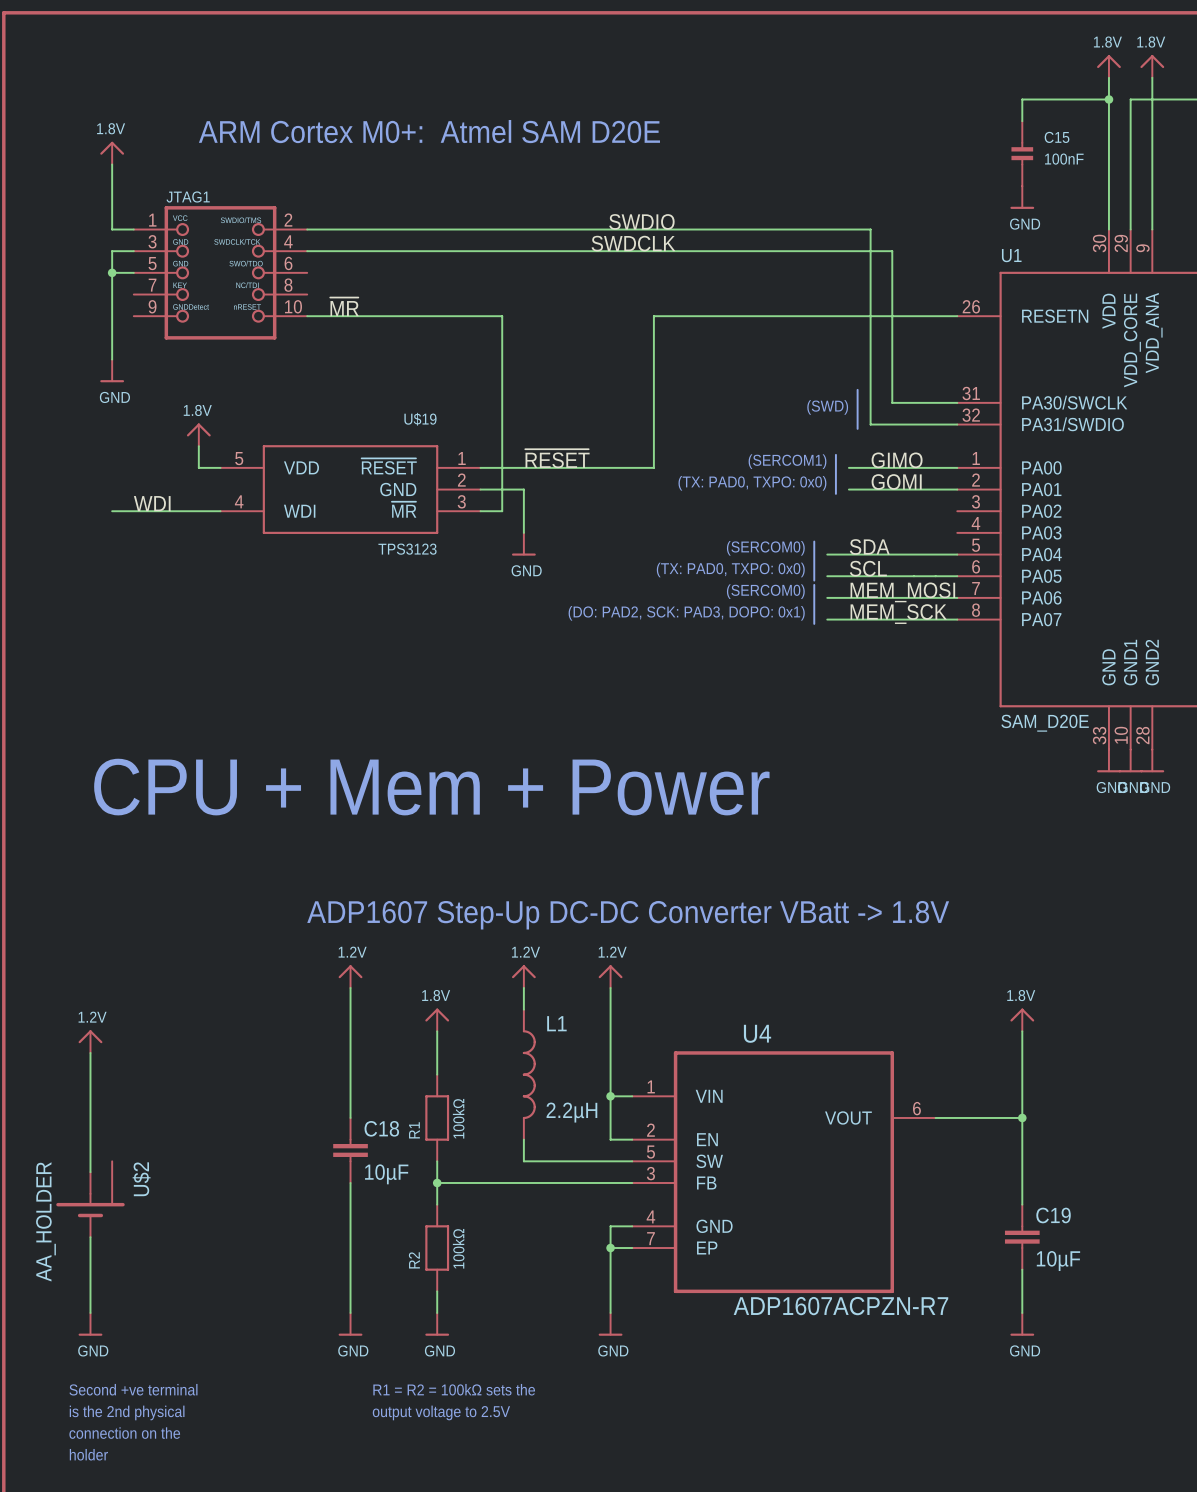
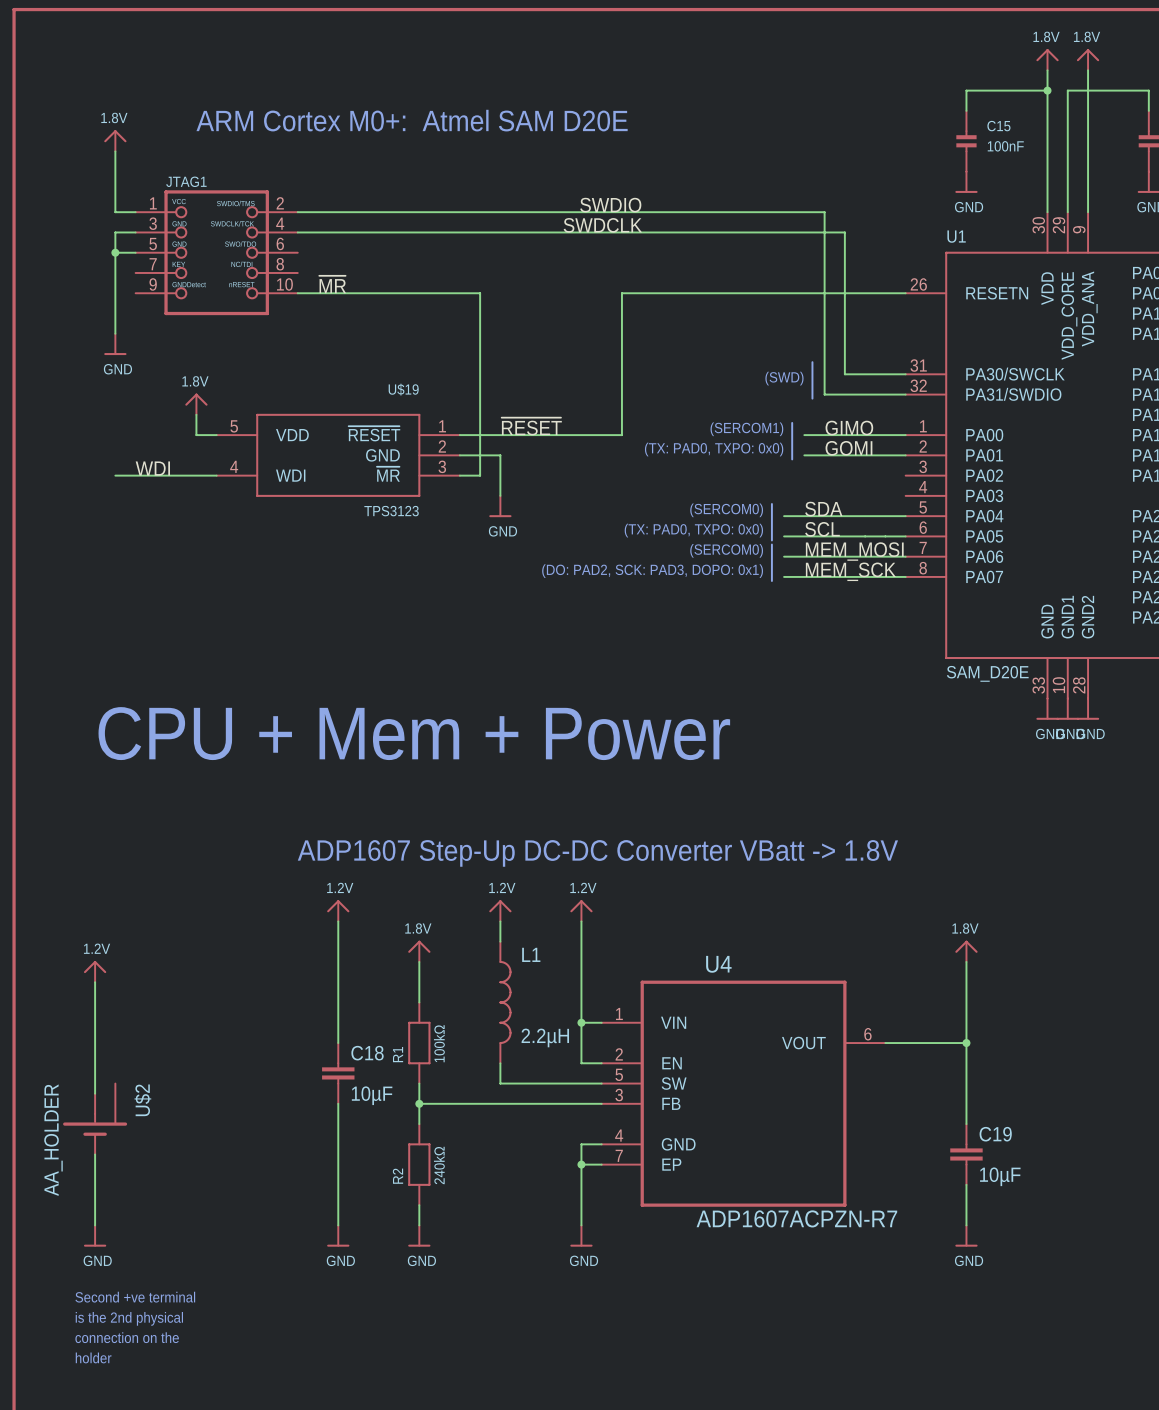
R2 value: 100kΩ (458, 1248) -> 240kΩ (439, 1165)
text: R1 = R2 = 100kΩ sets the (454, 1389) -> none
text: output voltage to 2.5V (441, 1412) -> none

